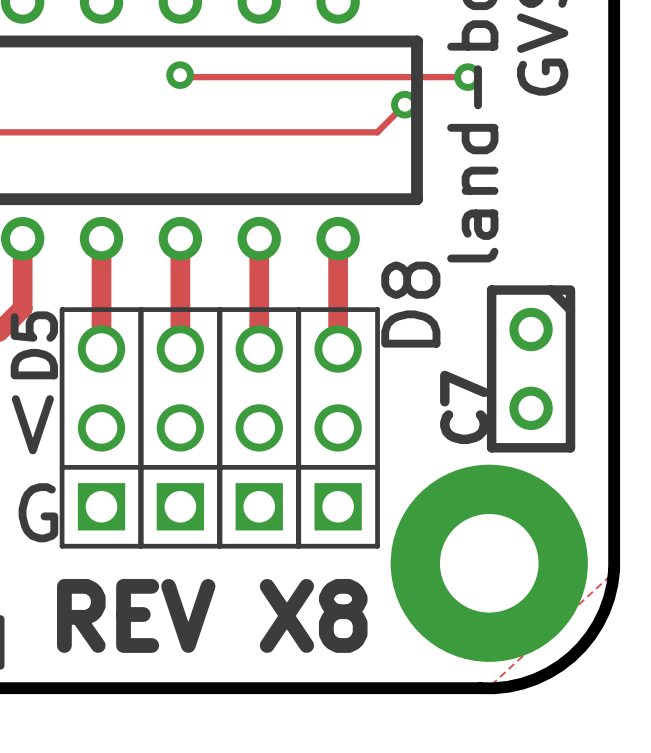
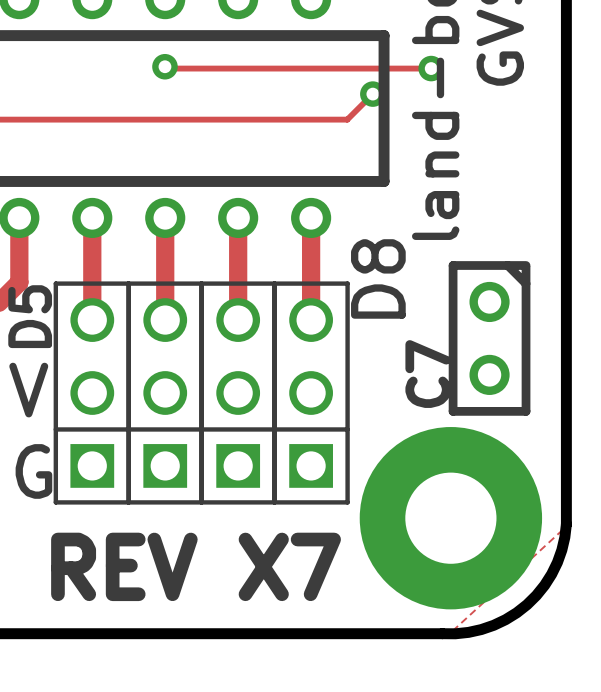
text: REV X8 (212, 615) -> REV X7 (196, 566)

